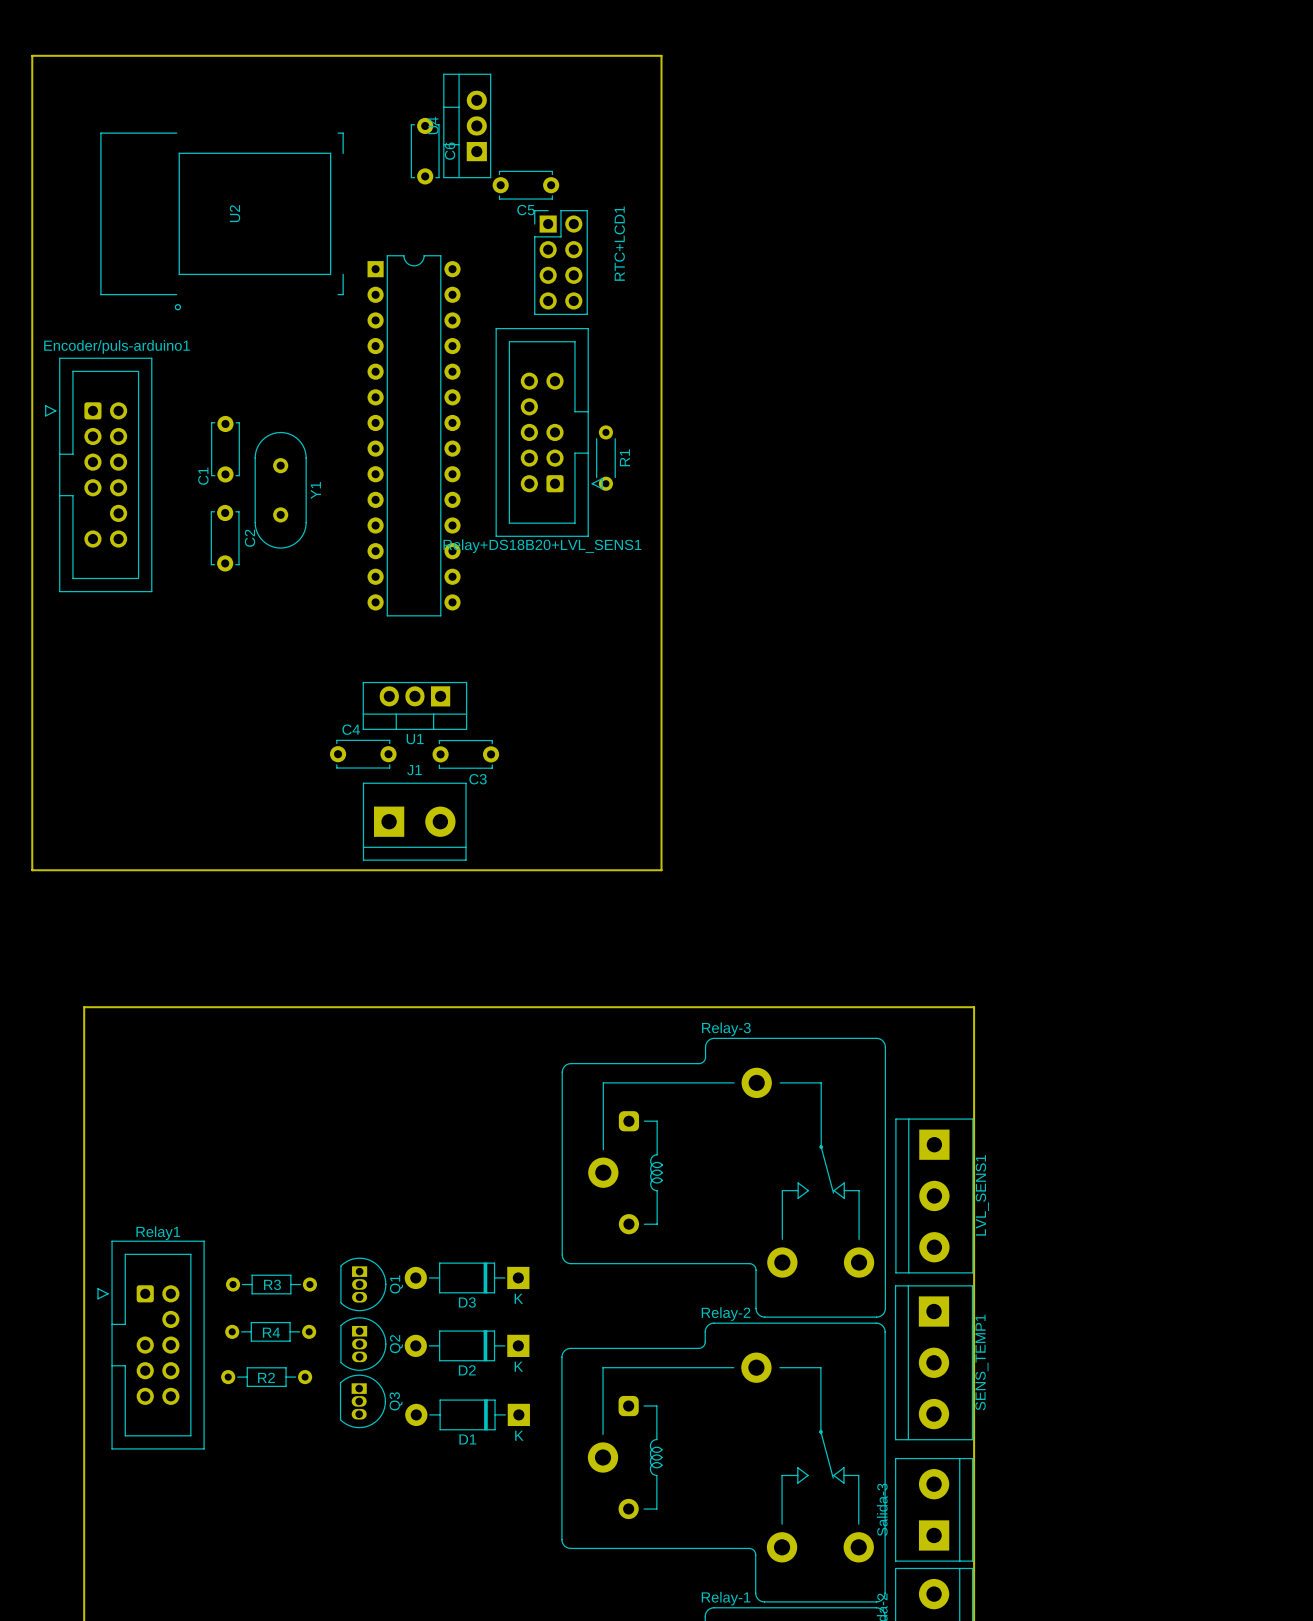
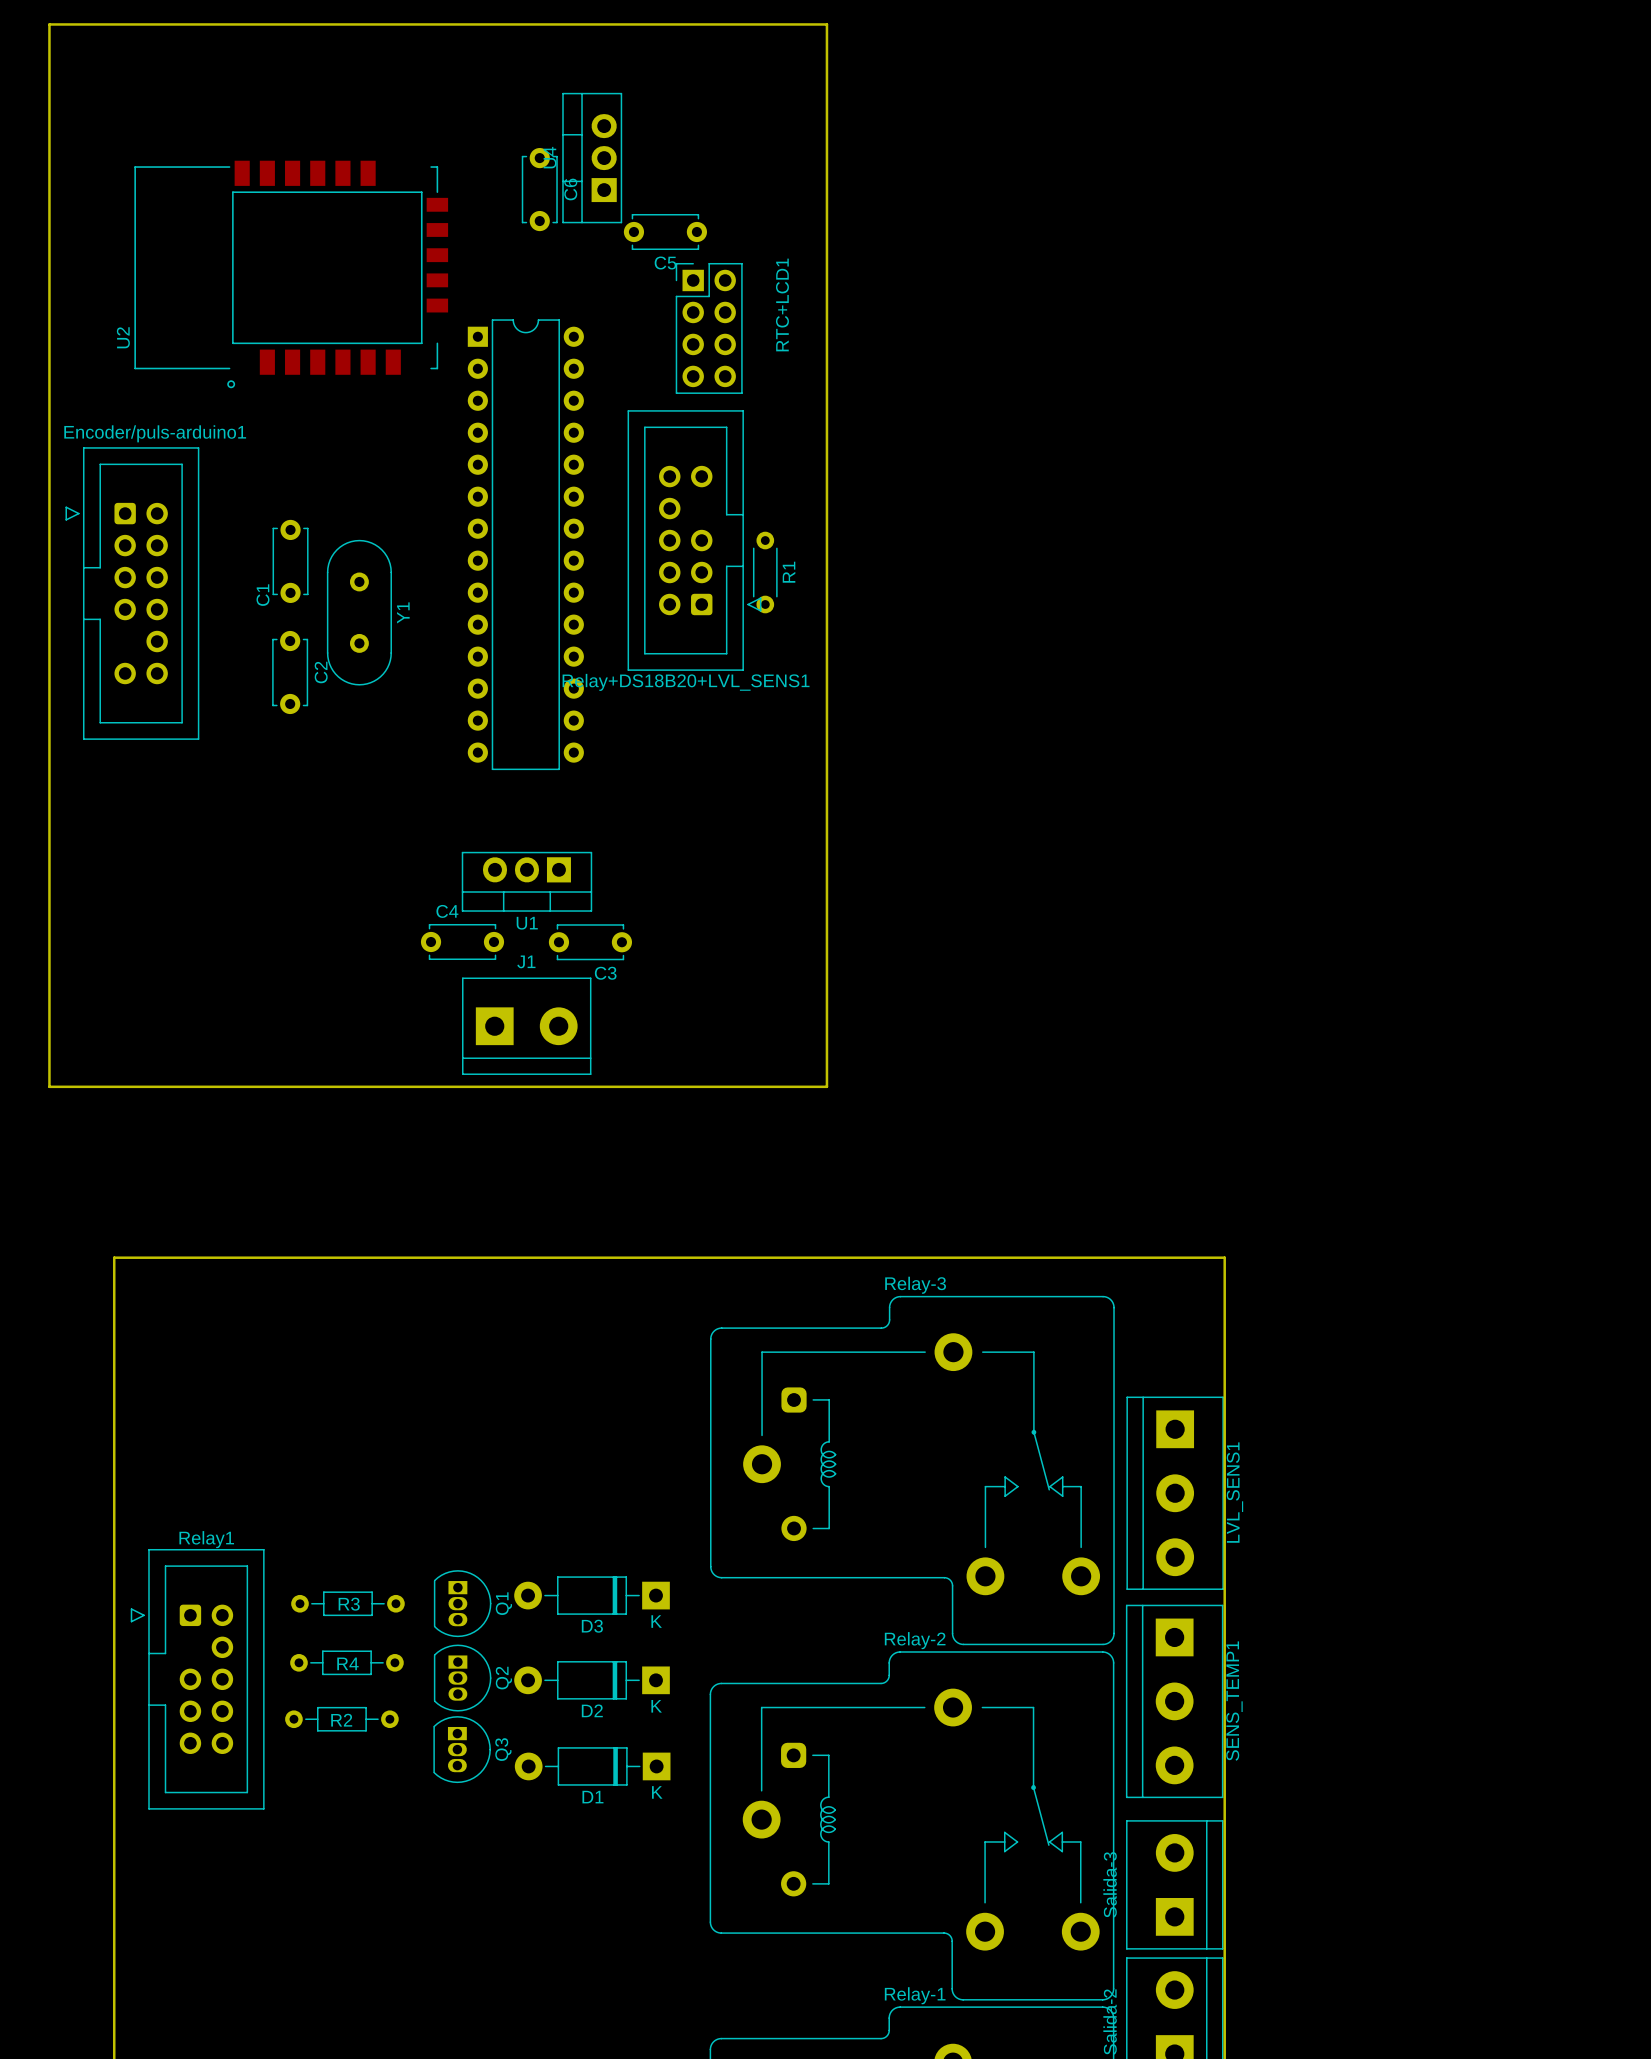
board edge: (32, 55) (661, 55) (661, 870) (655, 870) -> (49, 70) (49, 24) (826, 24) (826, 1086)
U2 footprint: [100, 132, 344, 311] -> [134, 160, 449, 389]
U2 name position: U2 (234, 213) -> U2 (123, 337)

